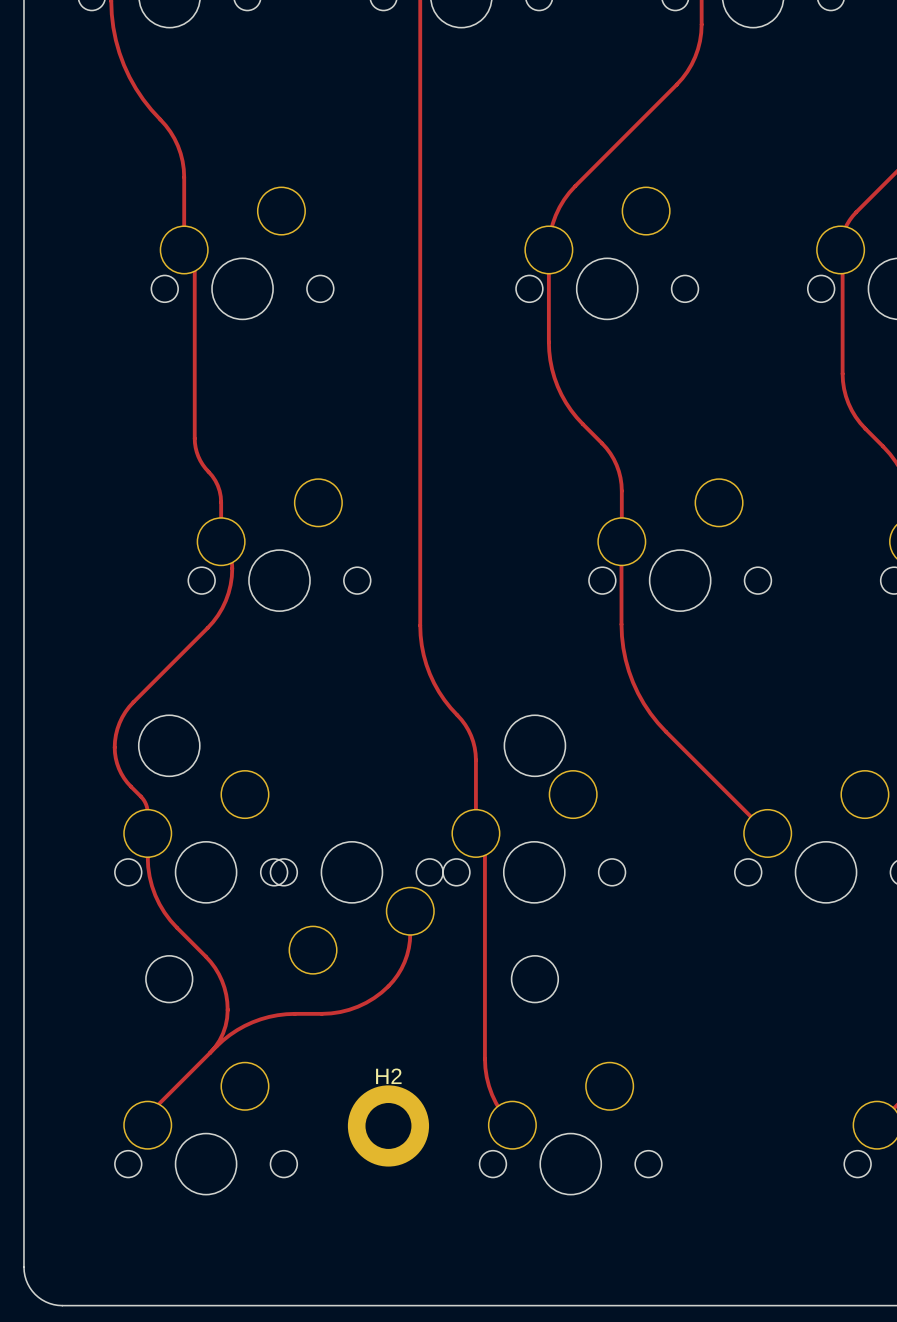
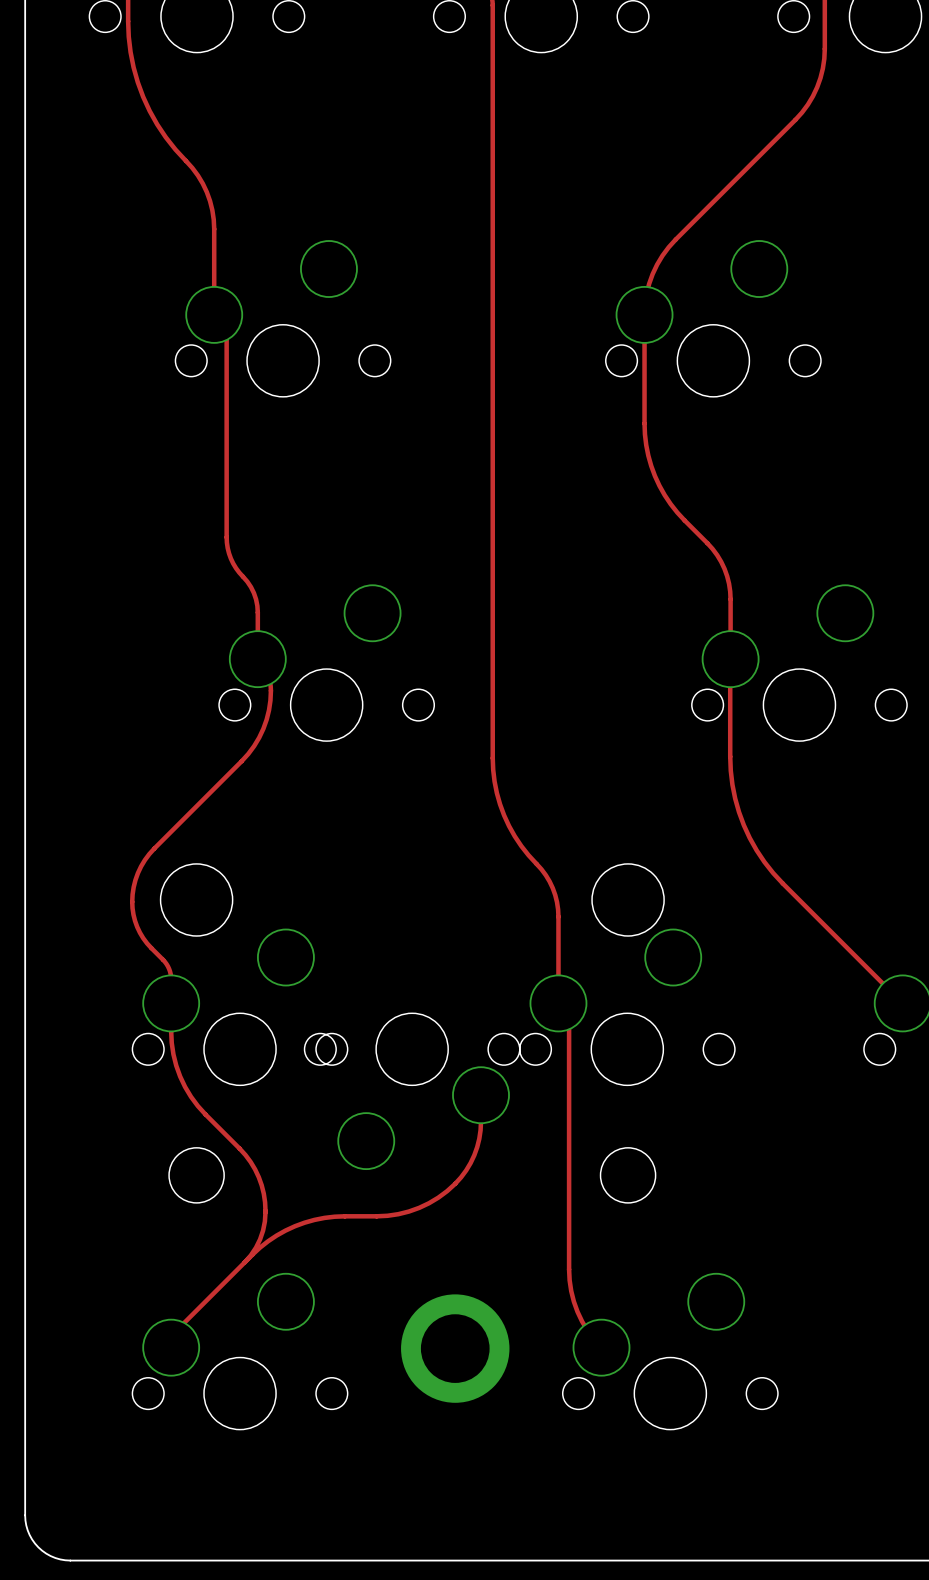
H2: (388, 1125) -> none
part: none -> (455, 1348)

